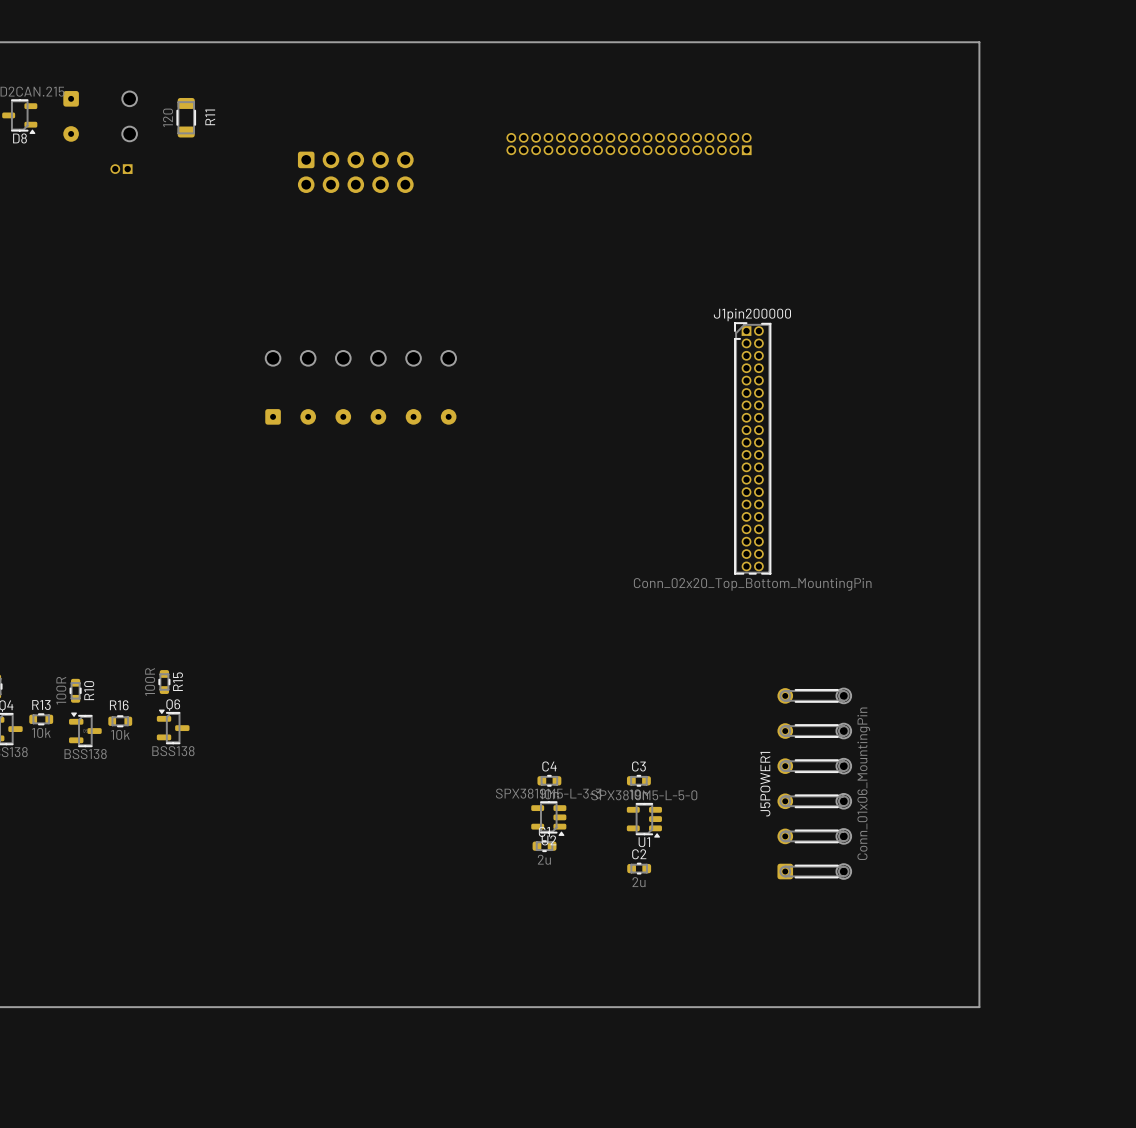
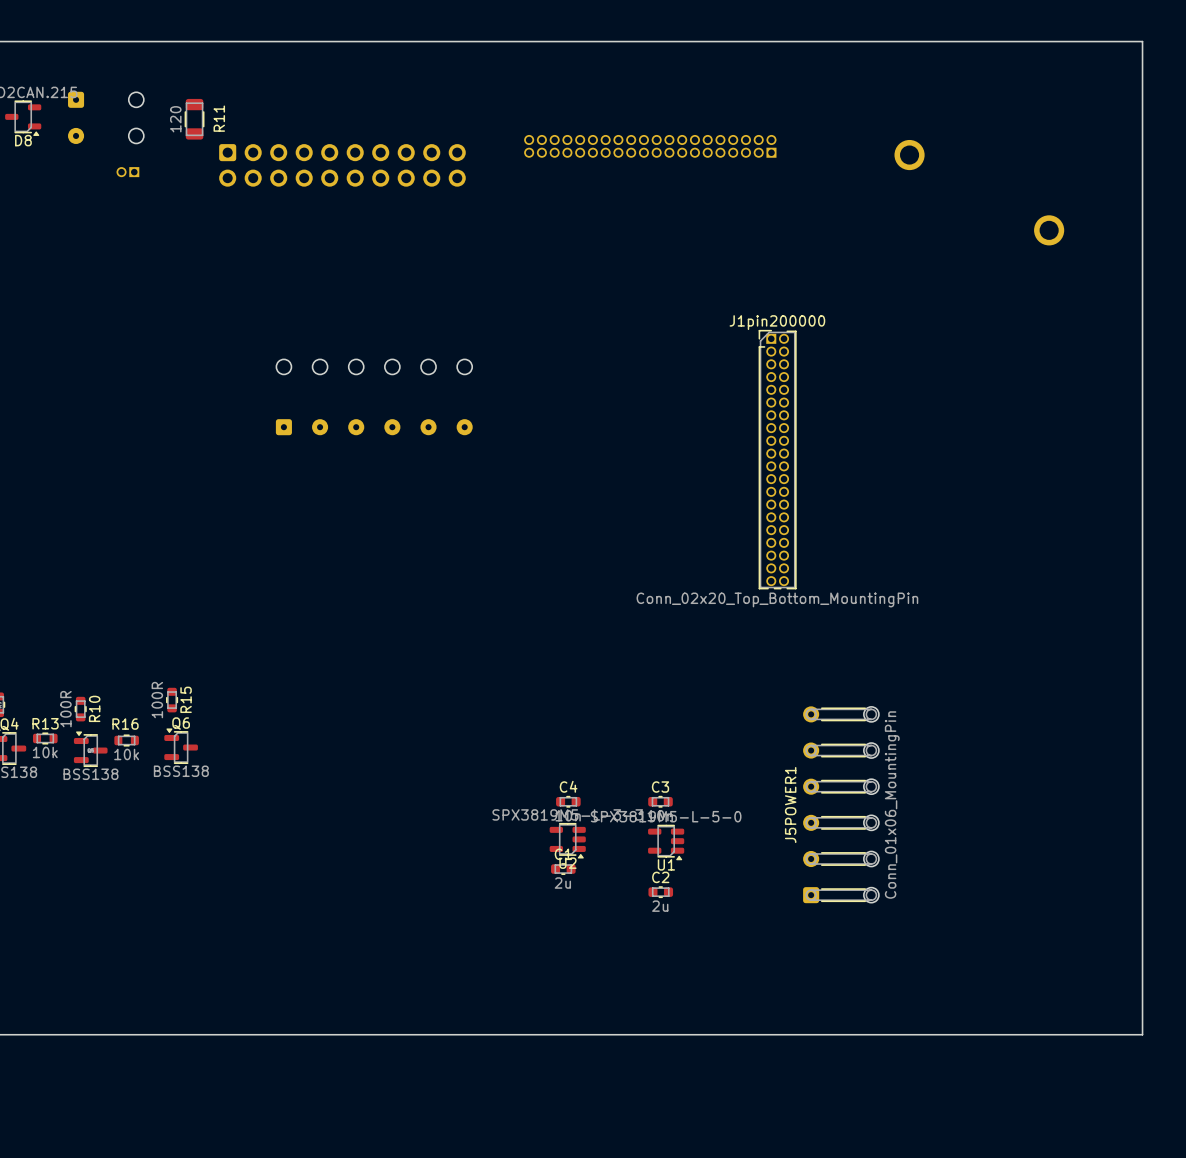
board edge: (979, 42) (979, 1007) -> (1010, 41) (1142, 41) (1142, 1034) (1010, 1034)
part: none -> (909, 155)
part: none -> (342, 165)
part: (355, 172) -> none
part: none -> (1049, 230)

